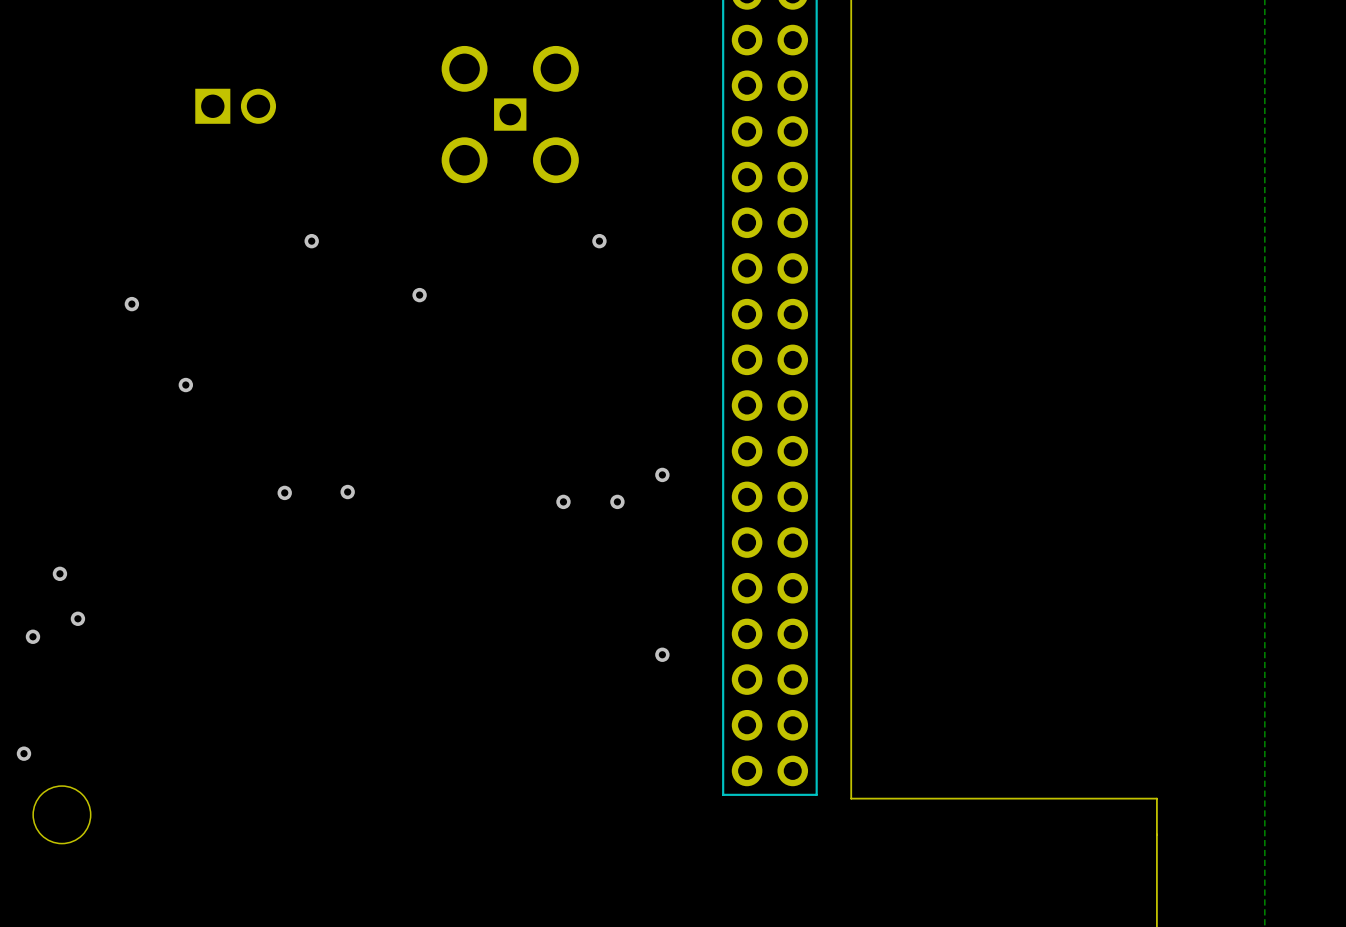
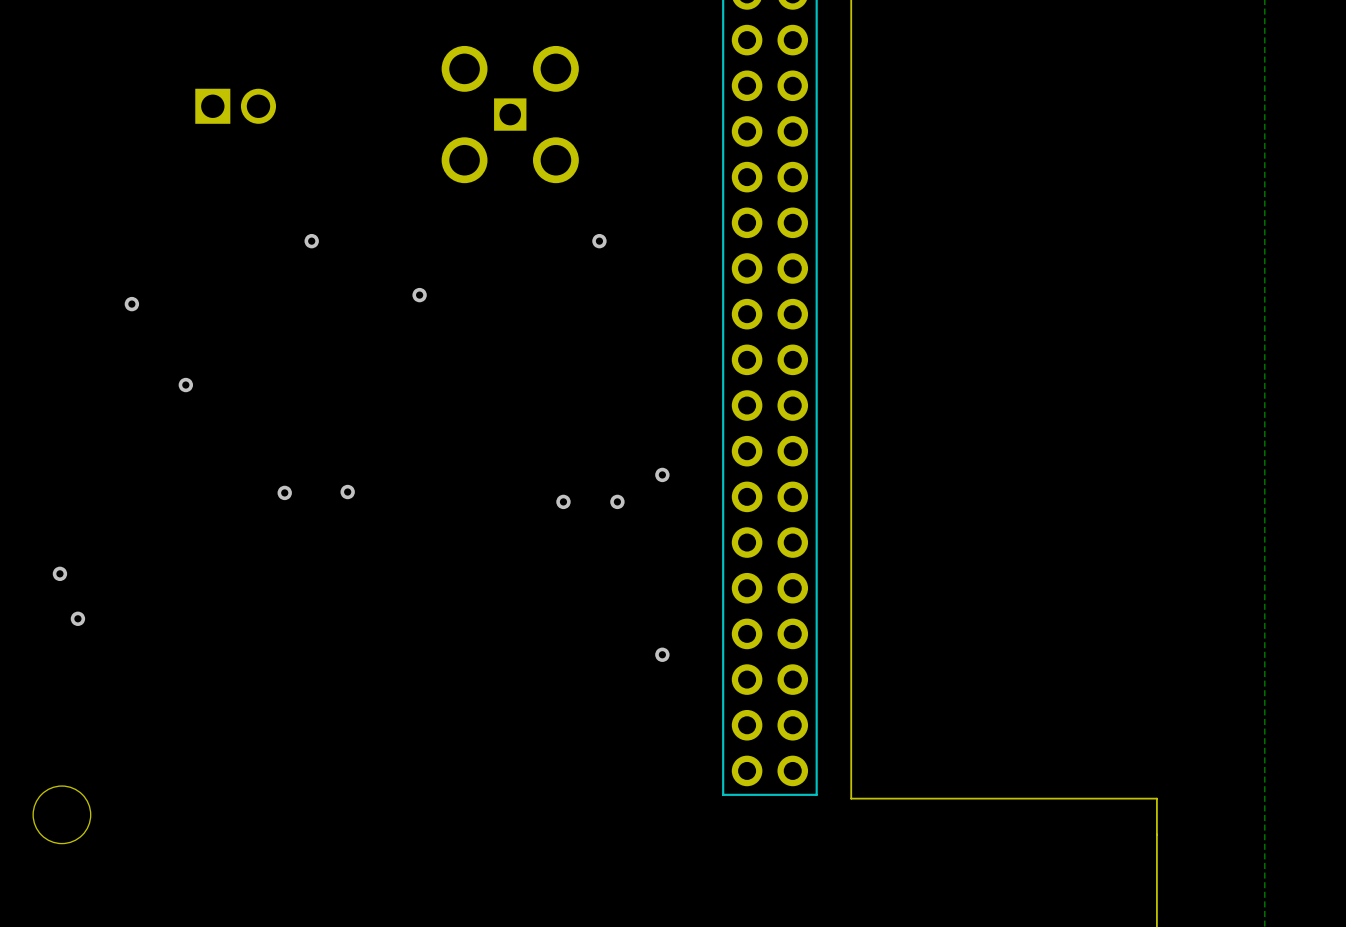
via: (32, 636) -> none
via: (23, 753) -> none

